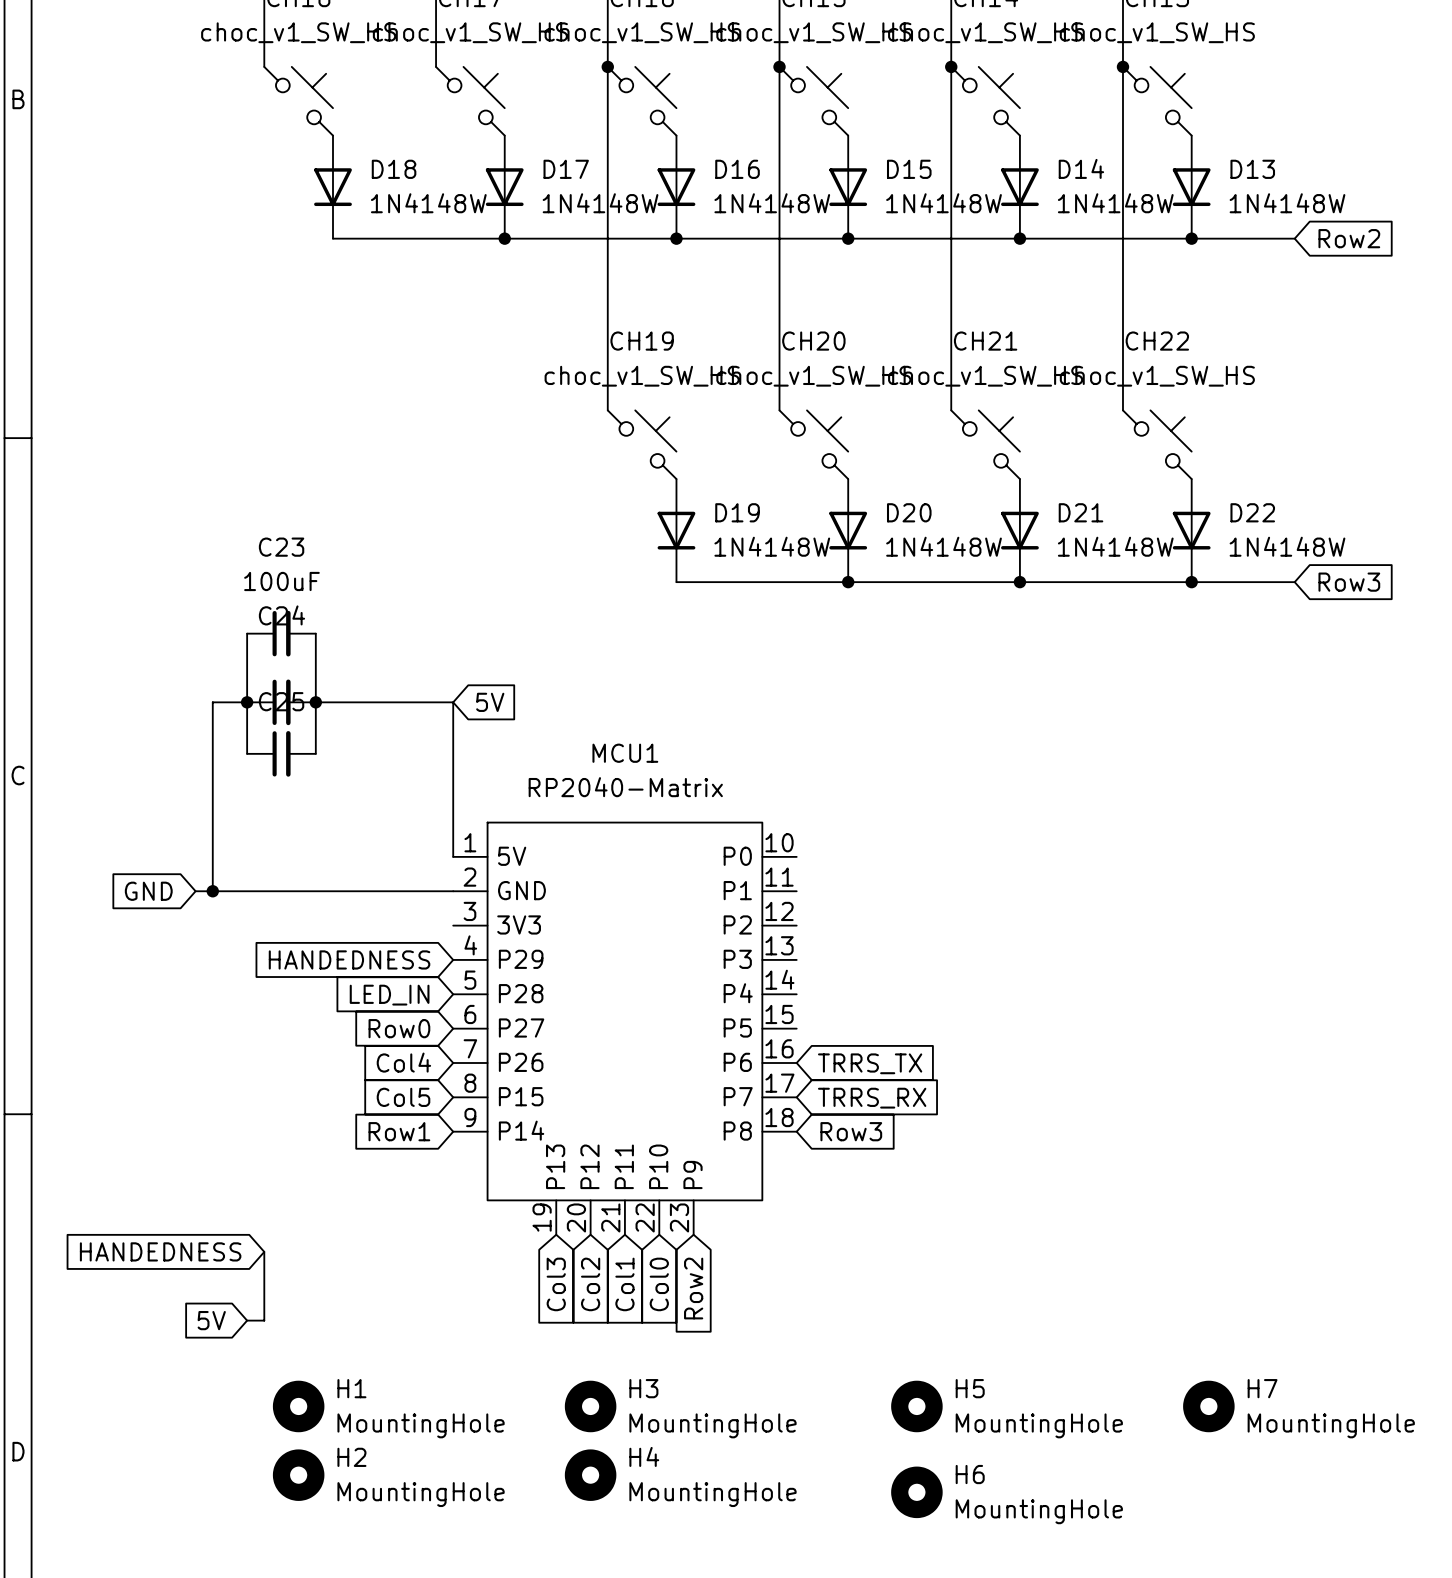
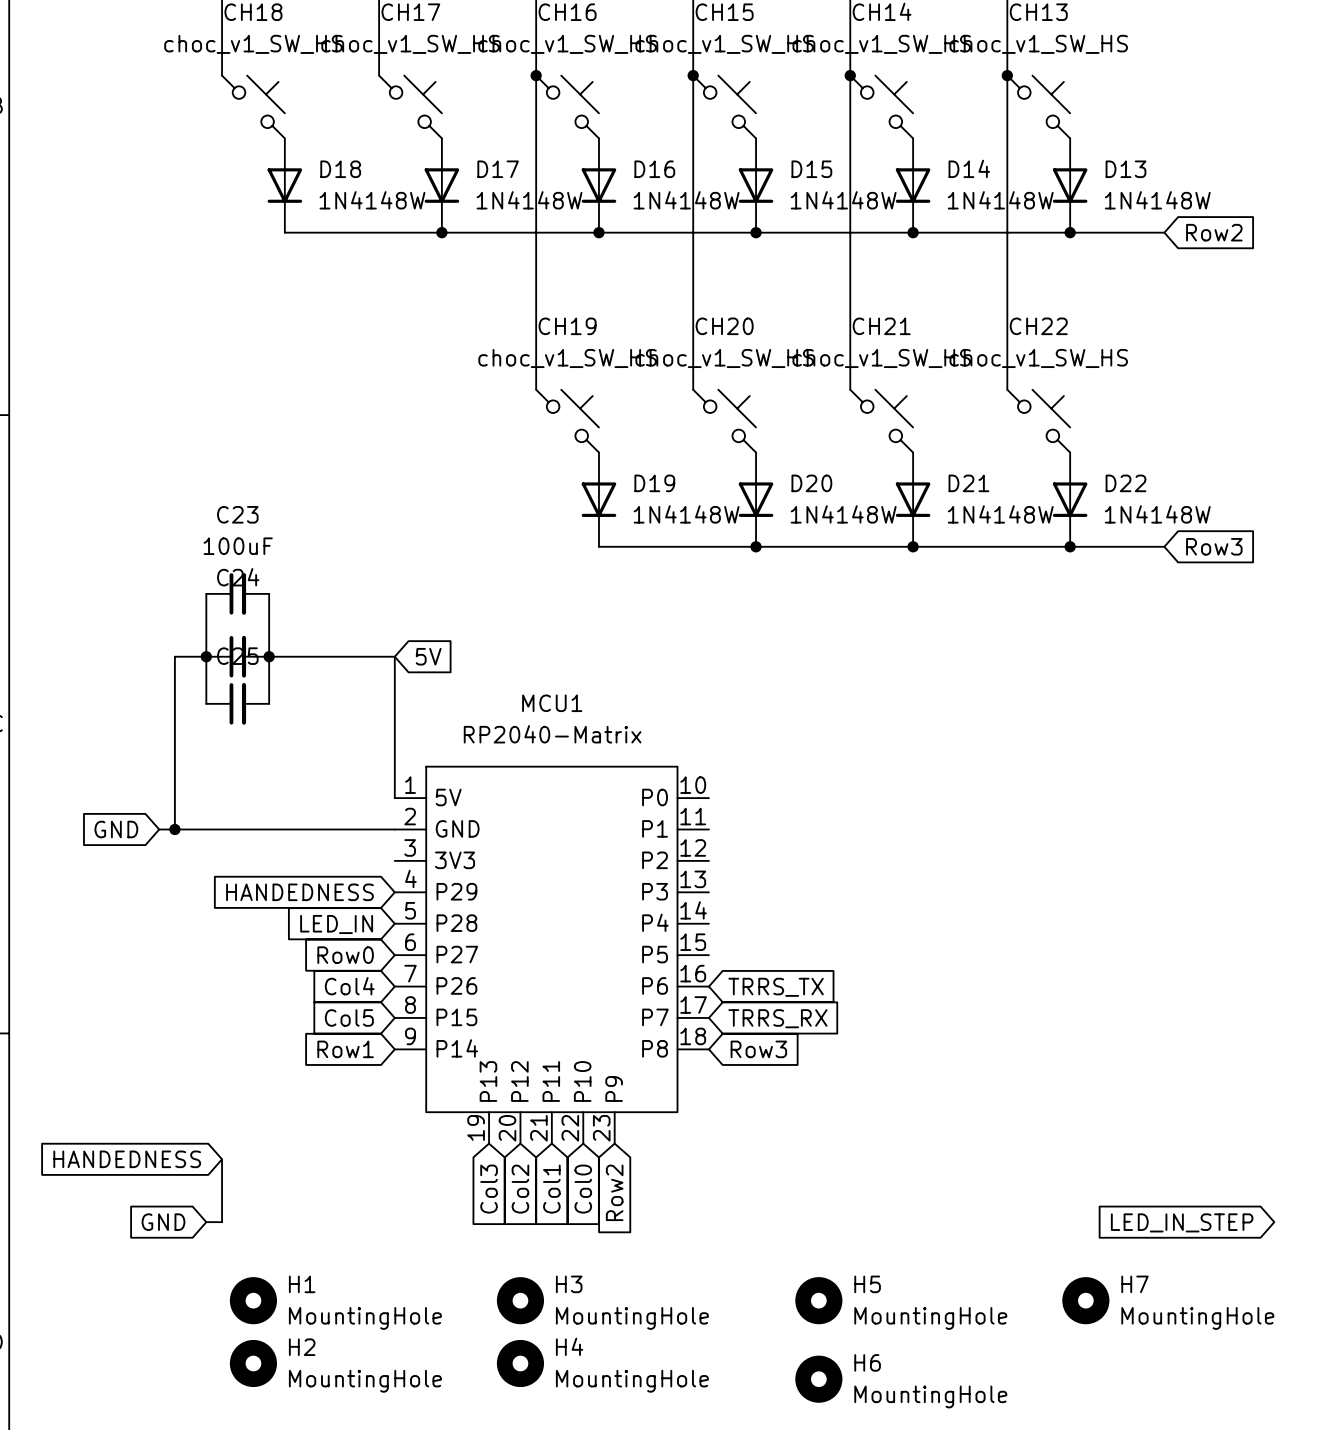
global label: 5V (211, 1320) -> GND (163, 1222)
global label: none -> LED_IN_STEP (1182, 1222)

